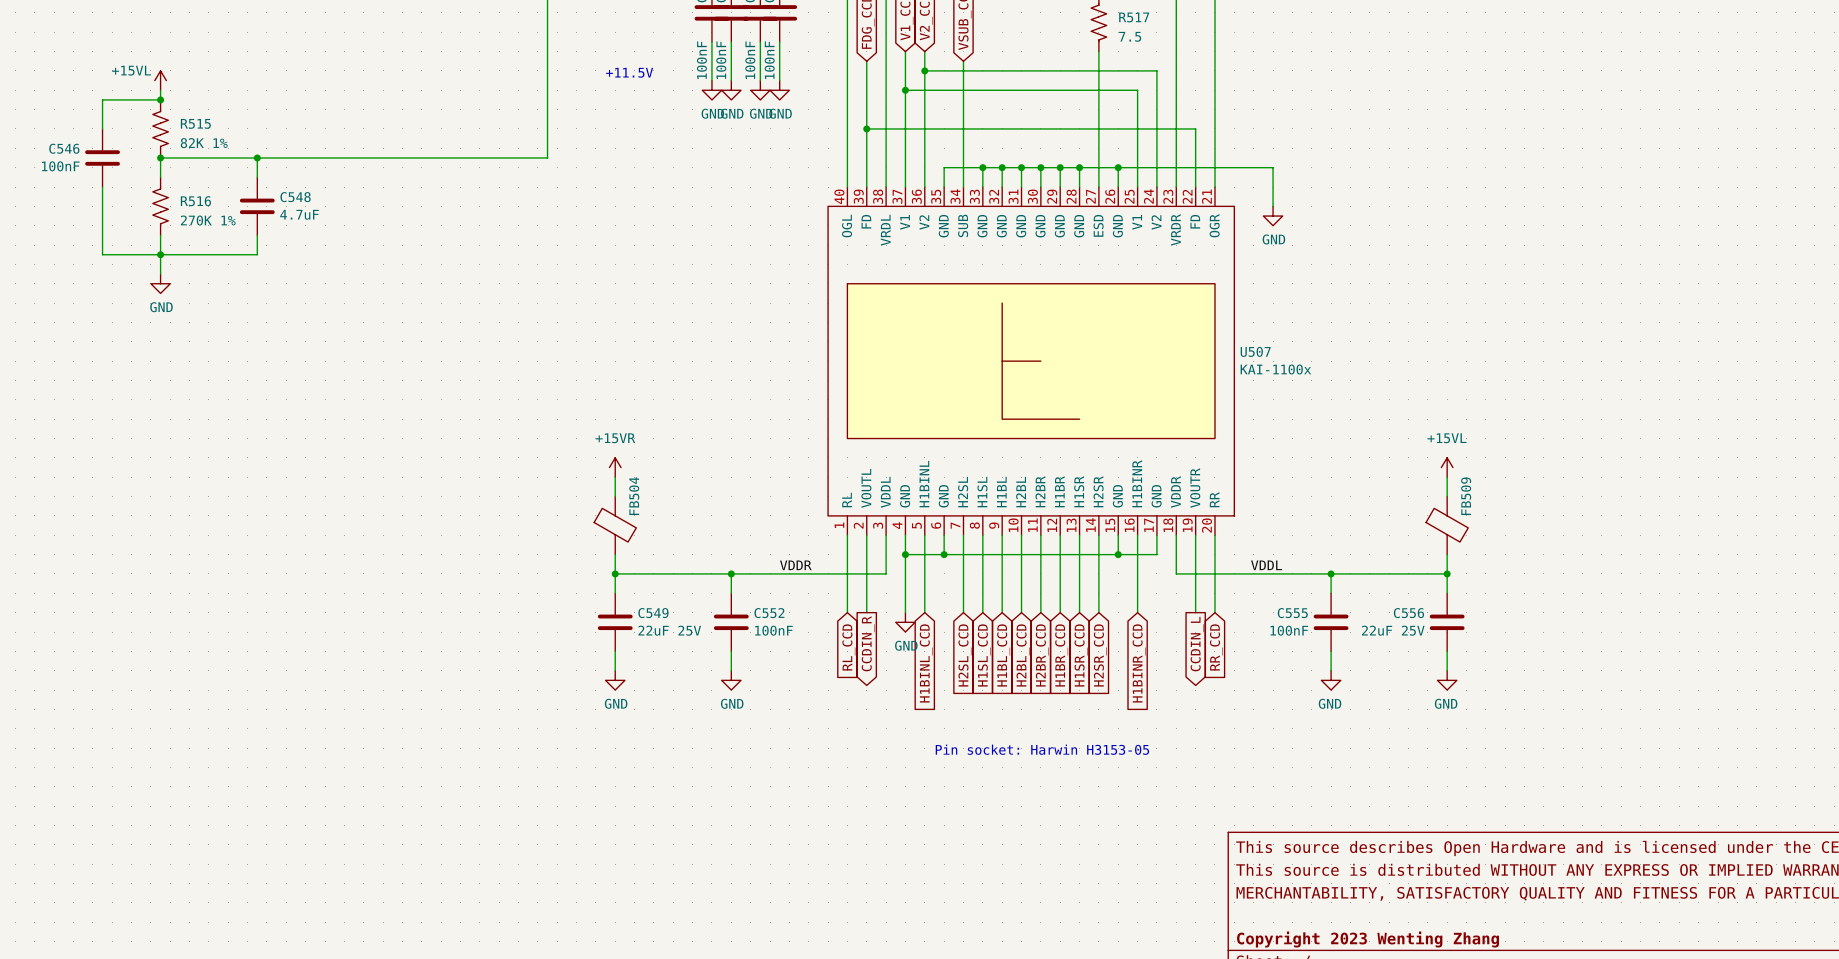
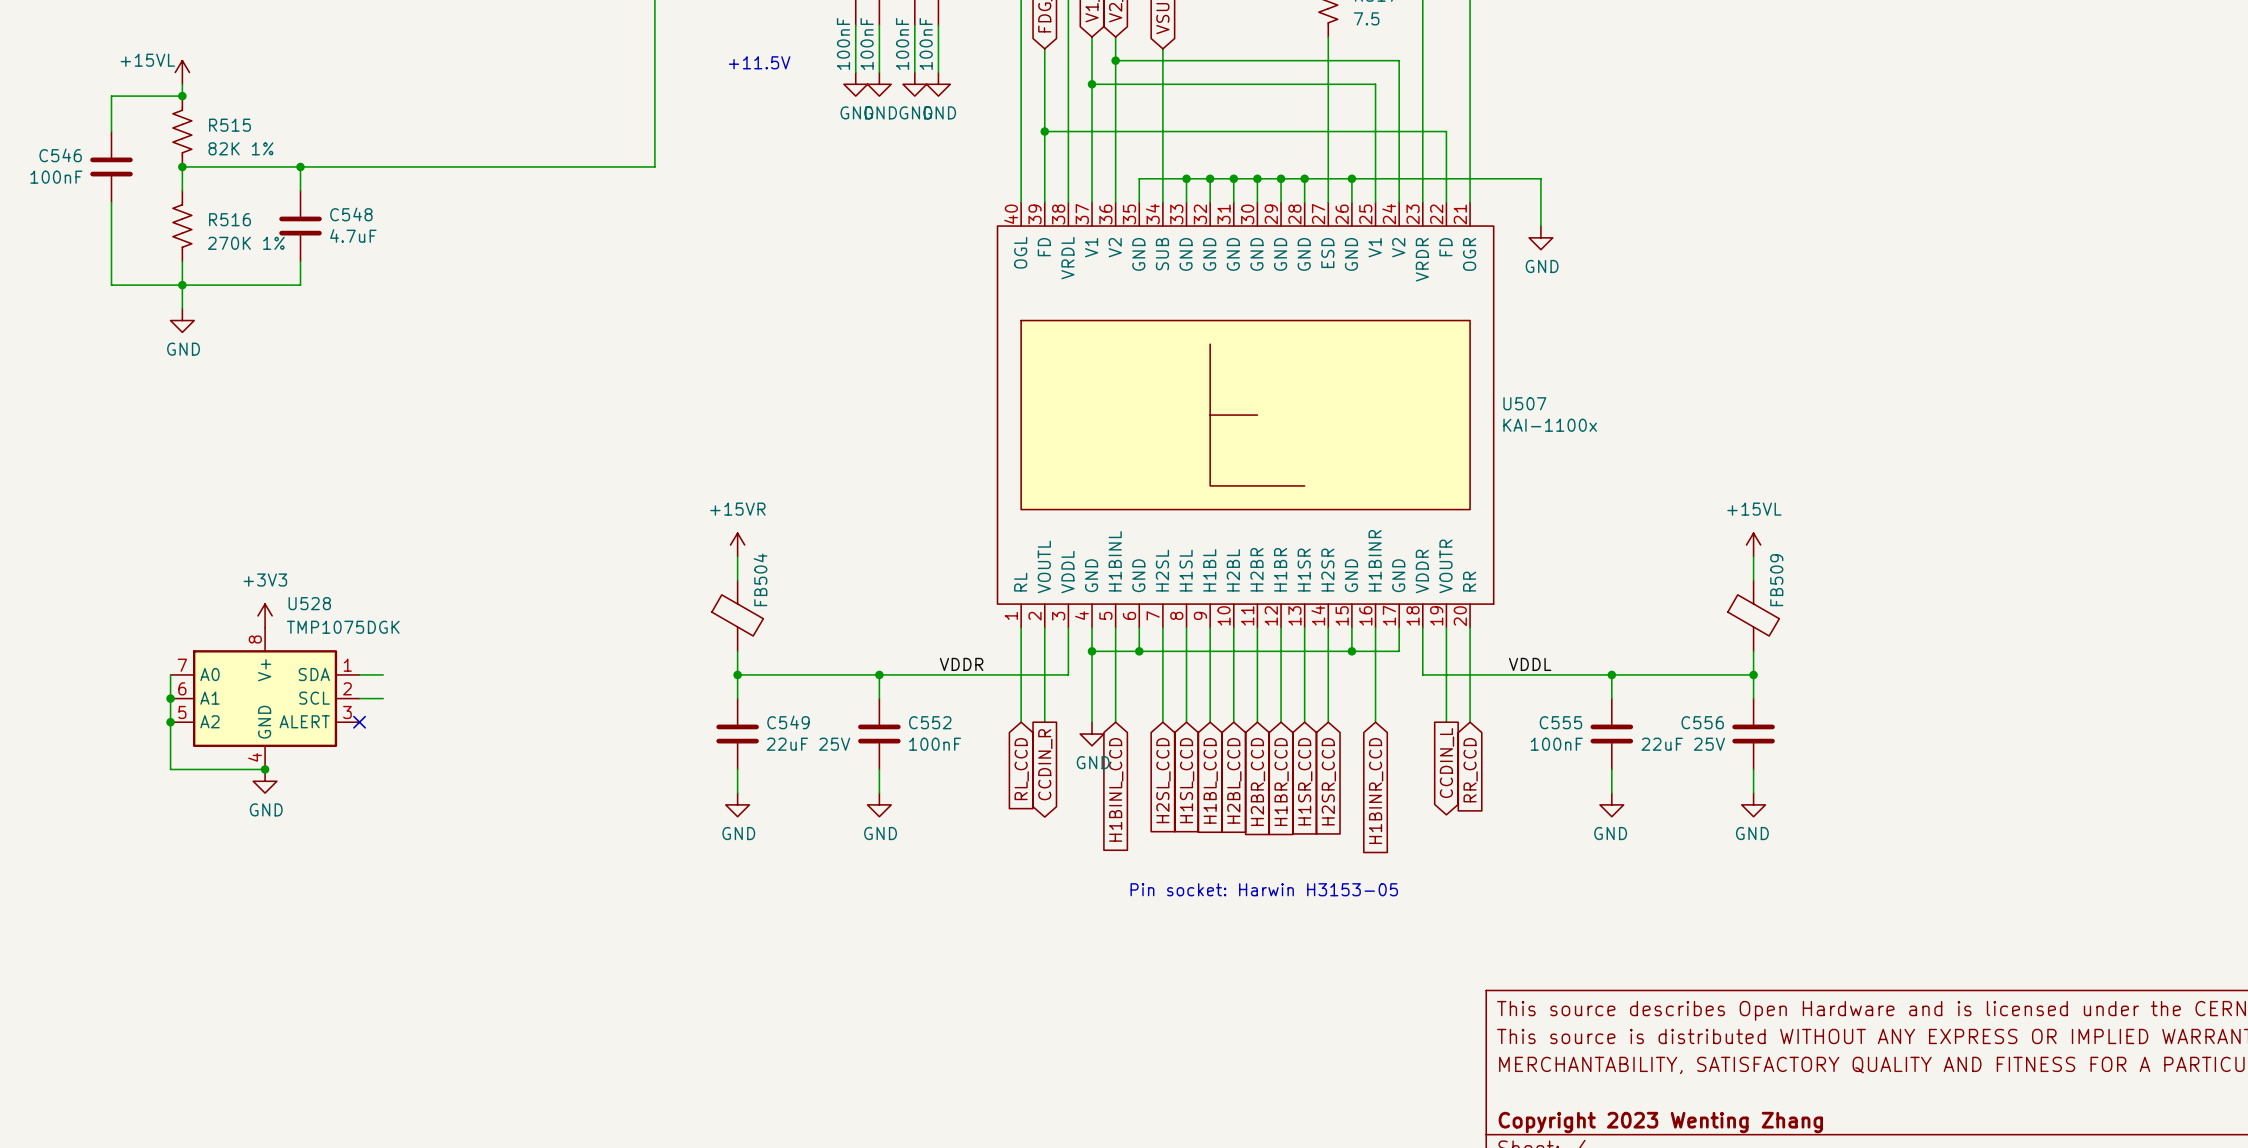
power symbol: none -> +3V3 (265, 615)
wire: none -> (170, 674) (170, 769) (265, 769)
wire: none -> (359, 674) (383, 674)
junction: none -> (170, 698)
U528: none -> TMP1075DGK (265, 698)
wire: none -> (359, 698) (383, 698)
junction: none -> (170, 722)
no-connect mark: none -> (359, 722)
junction: none -> (265, 769)
power symbol: none -> GND (265, 781)

